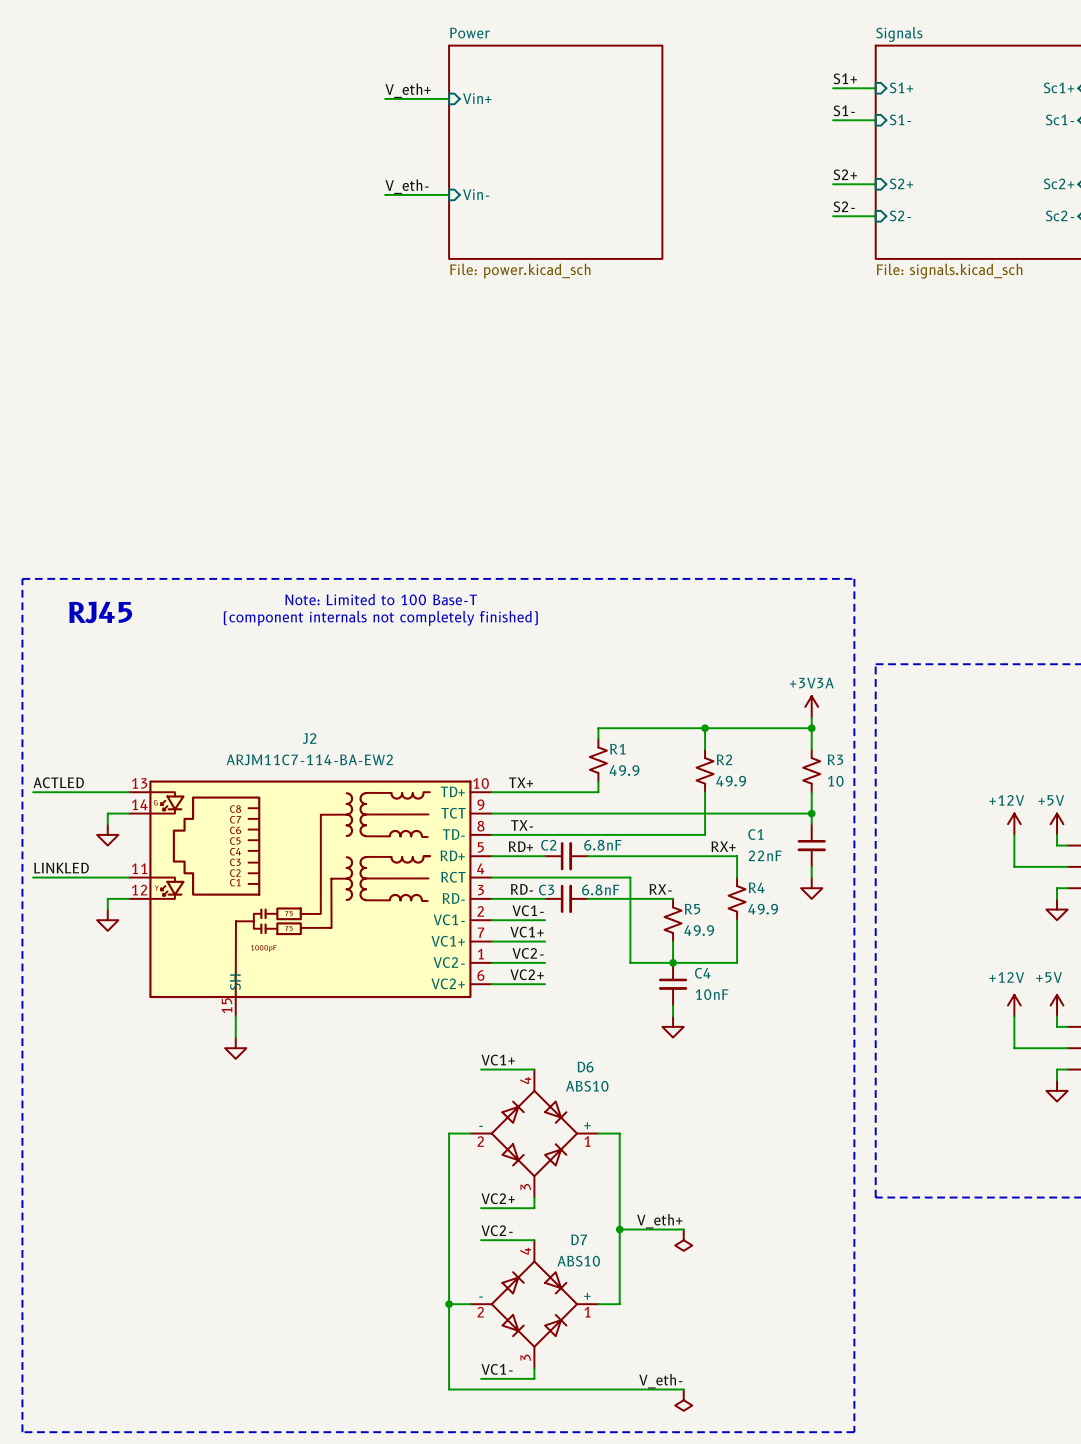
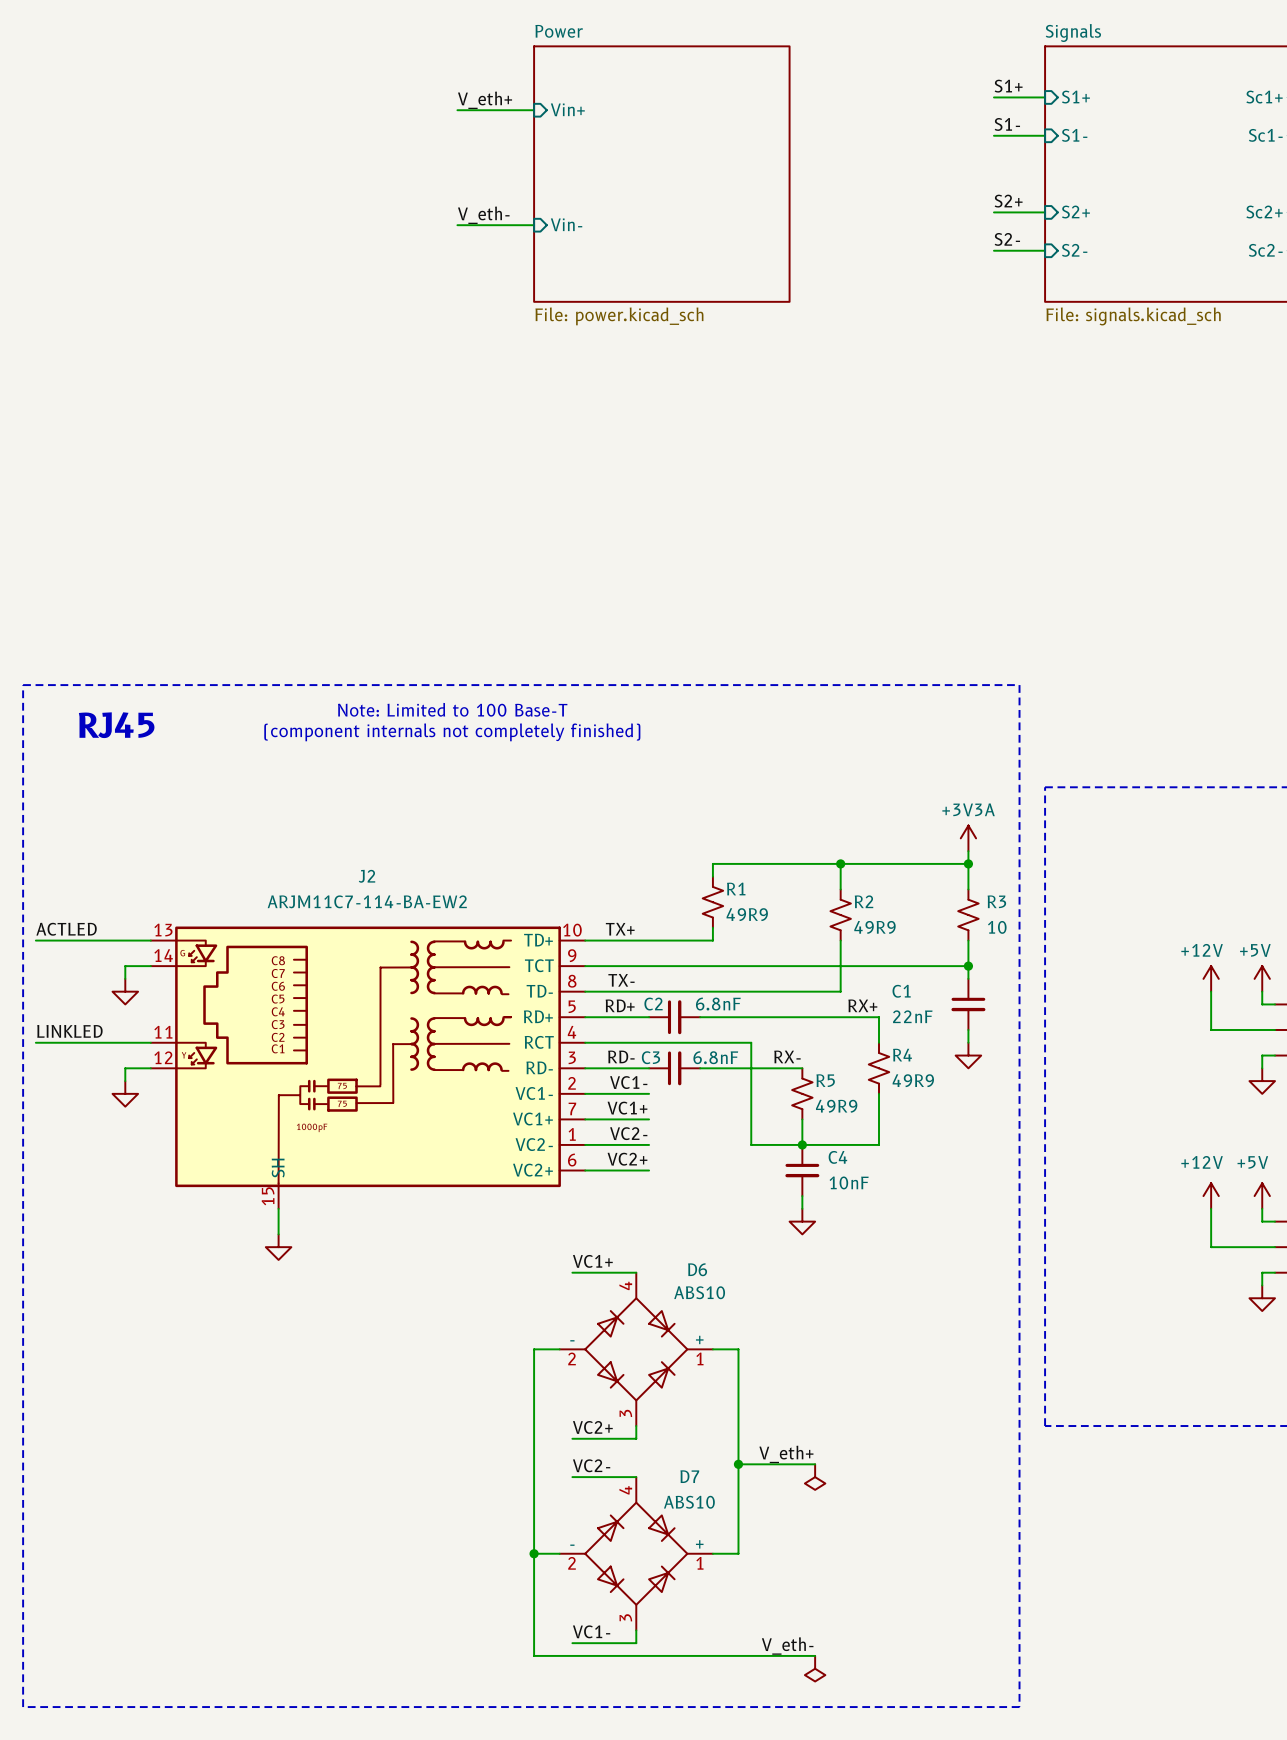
R1 value: 49.9 (624, 770) -> 49R9 (747, 914)
R2 value: 49.9 (731, 781) -> 49R9 (874, 927)
R4 value: 49.9 (763, 909) -> 49R9 (913, 1080)
R5 value: 49.9 (699, 930) -> 49R9 (836, 1106)

